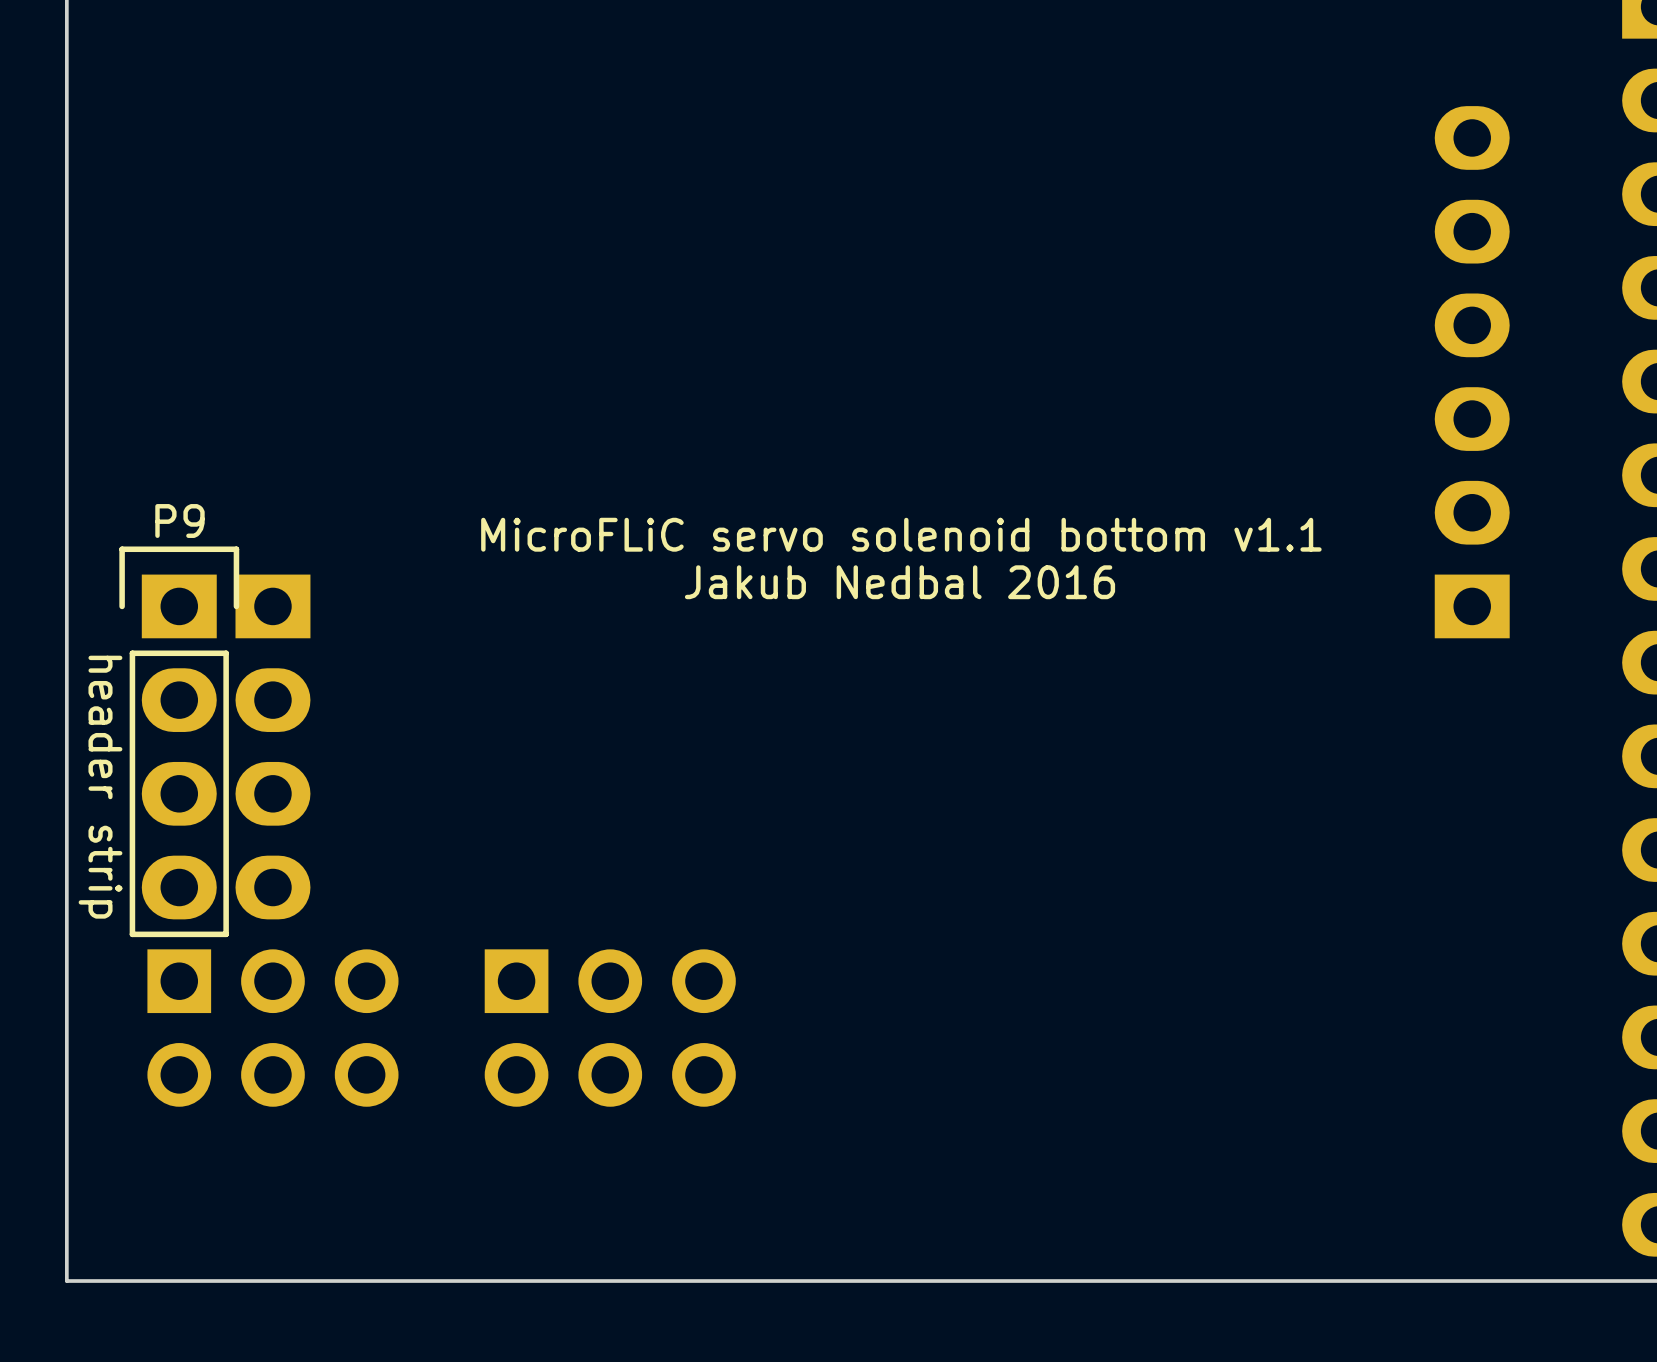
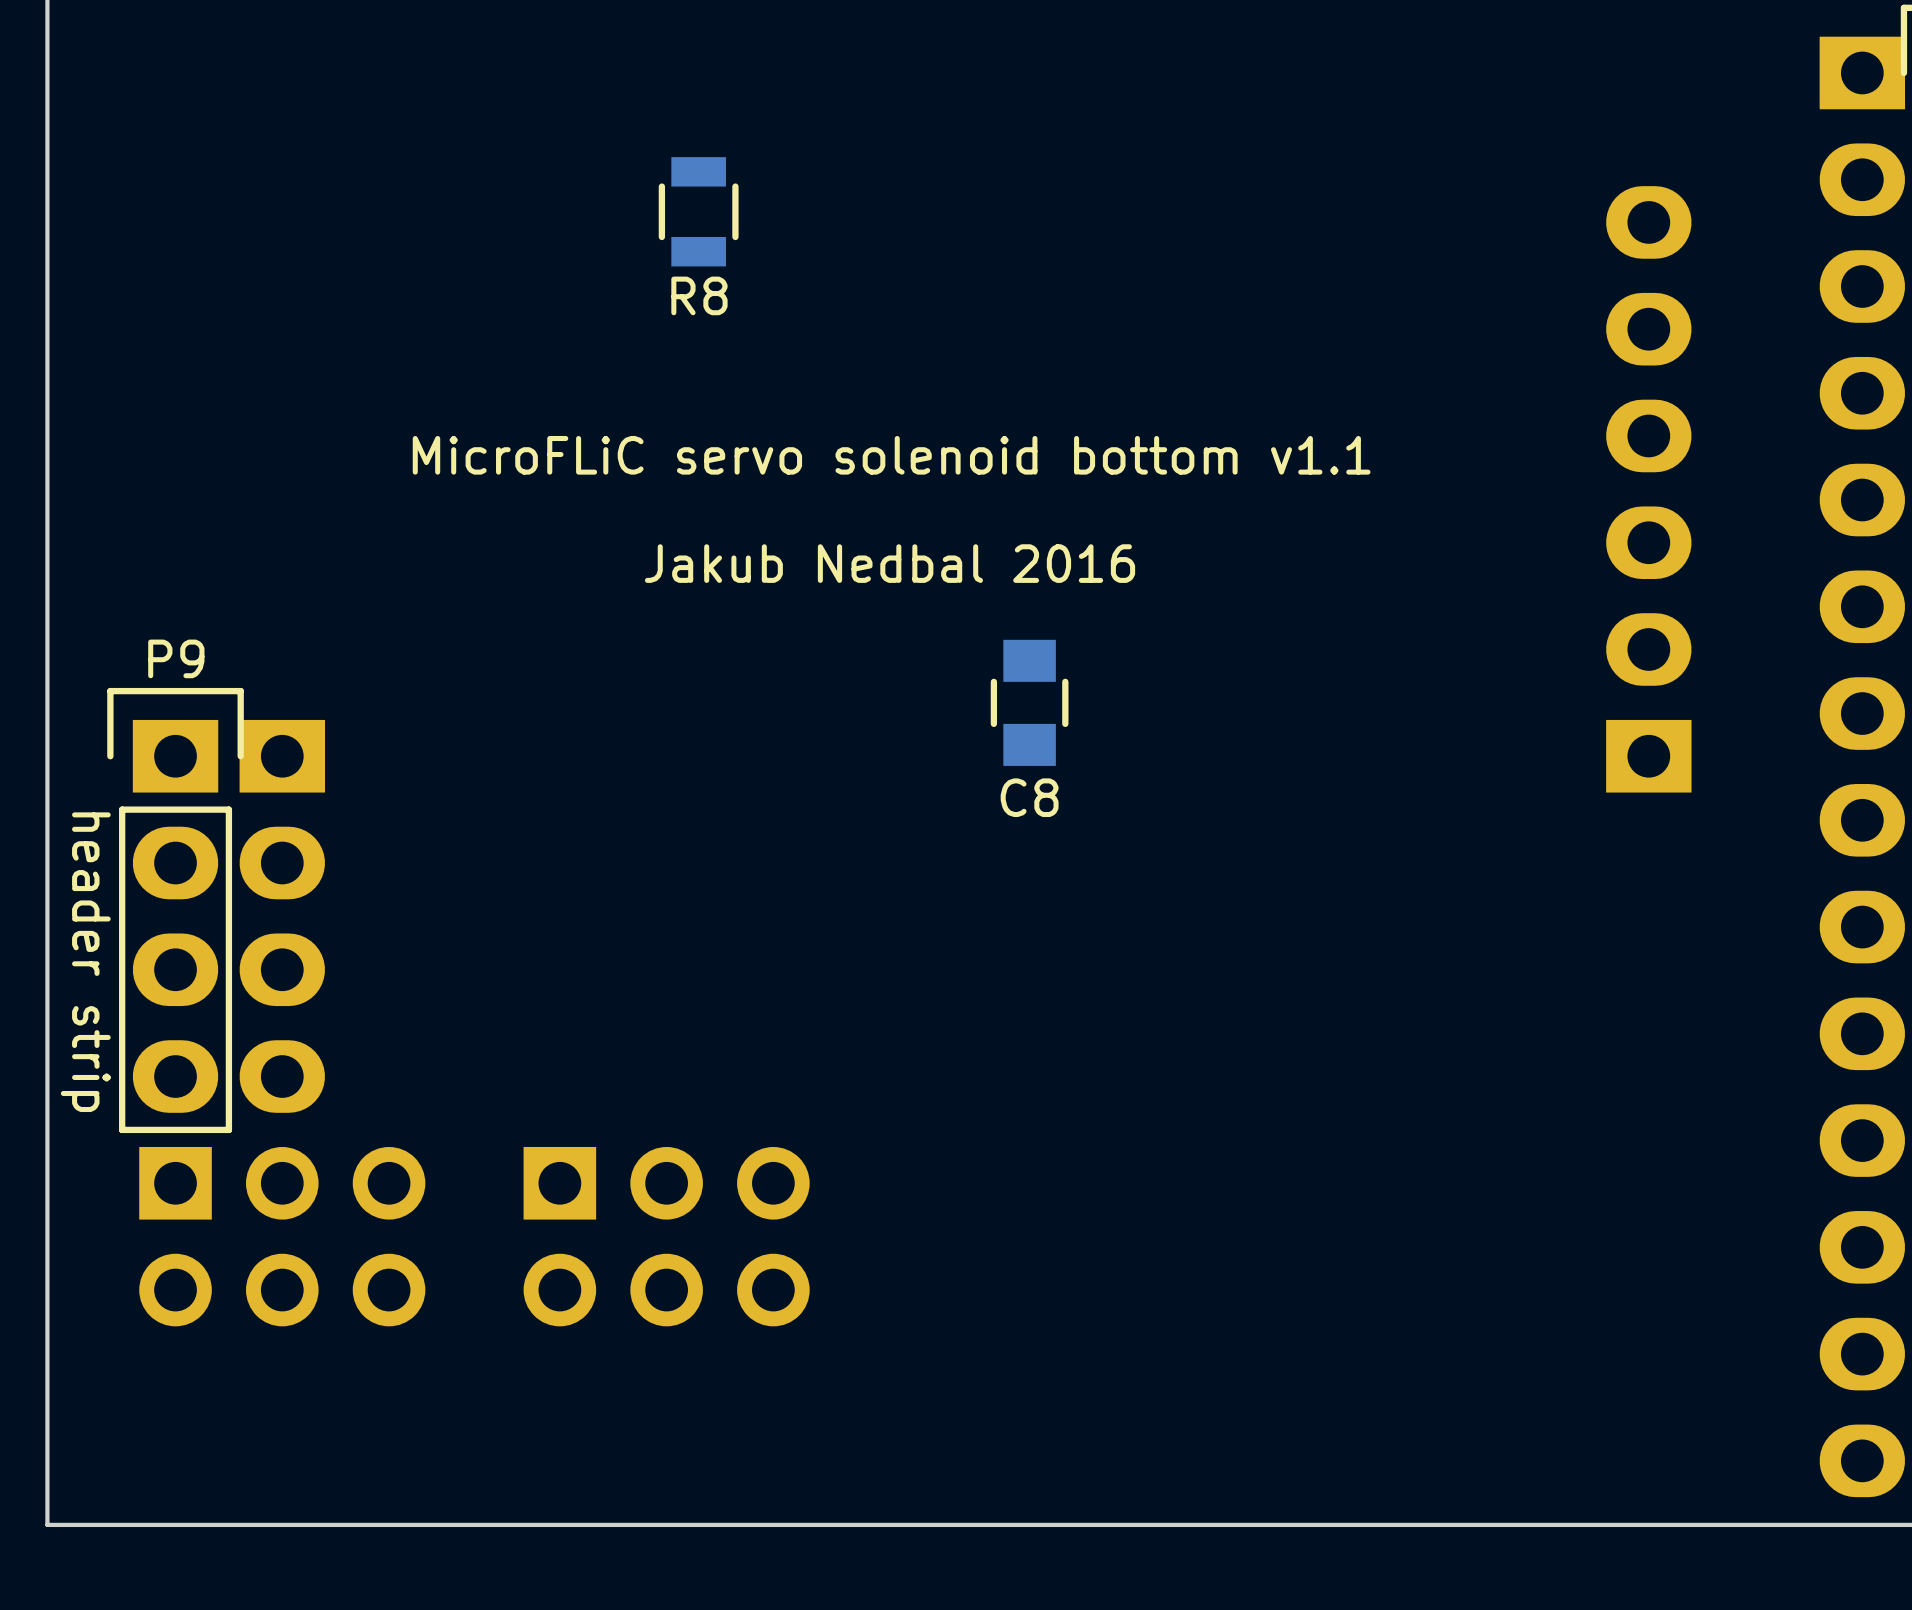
R8: none -> (698, 211)
text position: MicroFLiC servo solenoid bottom v1.1 (901, 534) -> MicroFLiC servo solenoid bottom v1.1 (891, 455)
C8: none -> (1029, 702)
text position: Jakub Nedbal 2016 (900, 582) -> Jakub Nedbal 2016 (890, 563)

